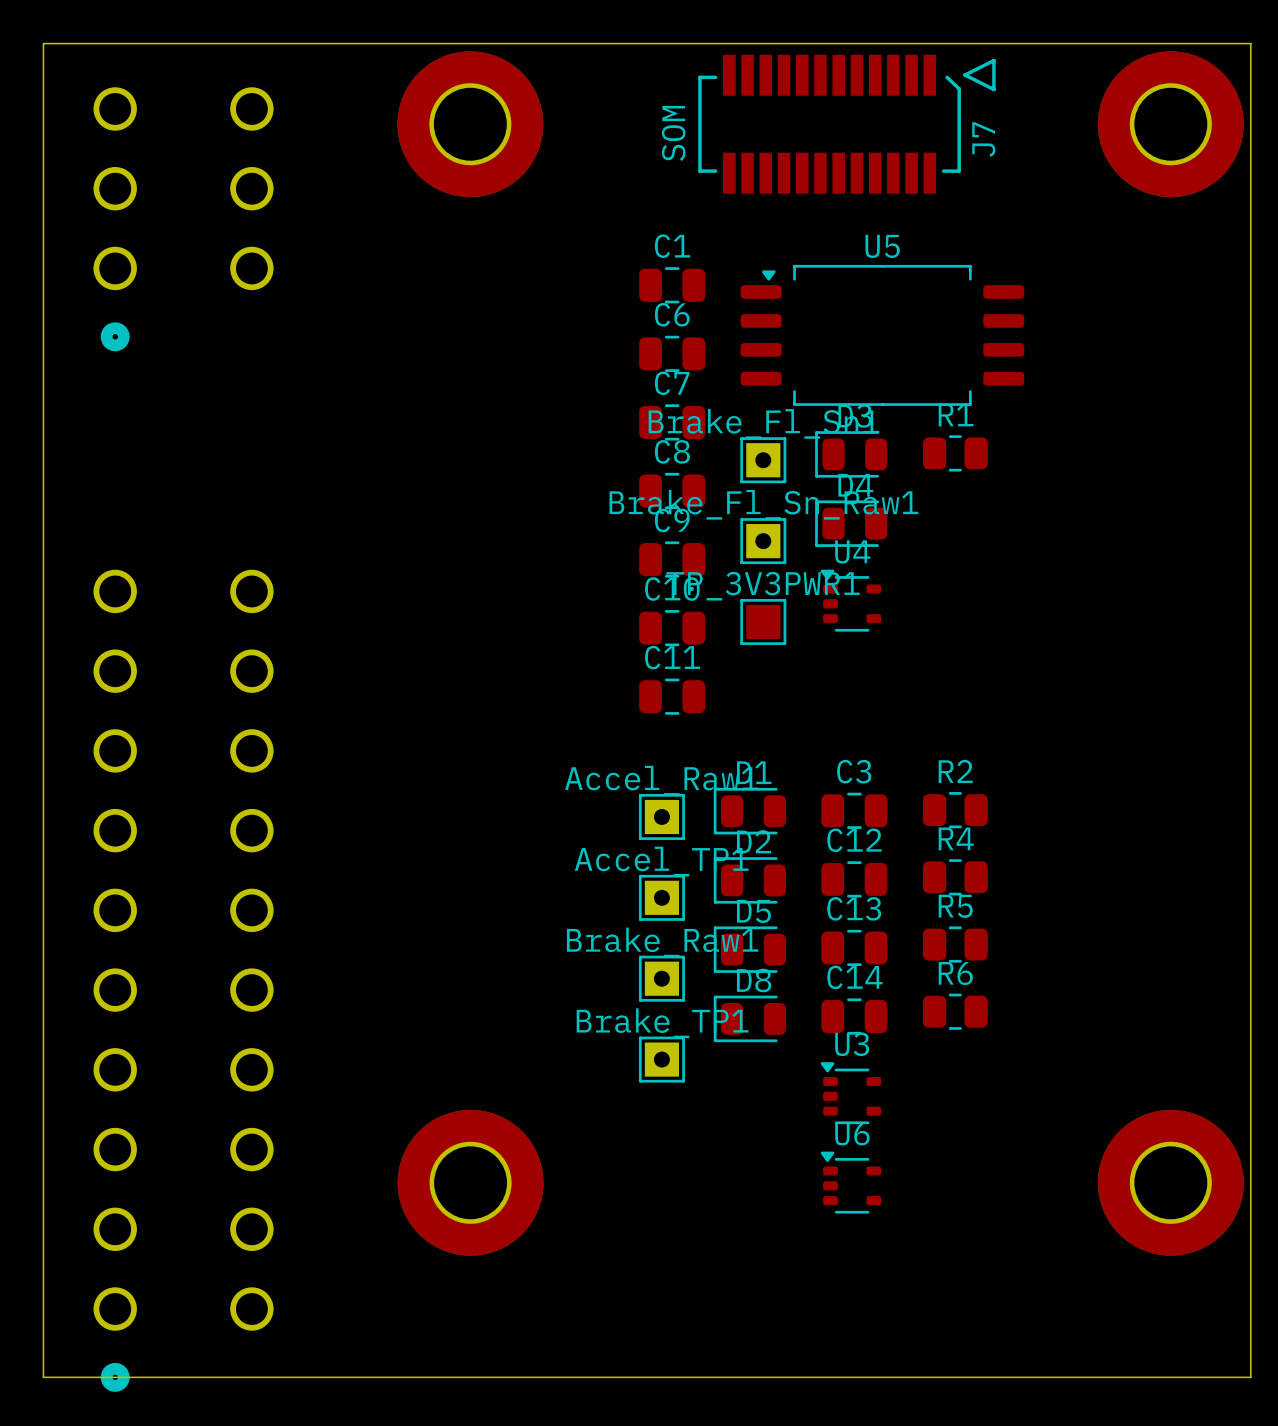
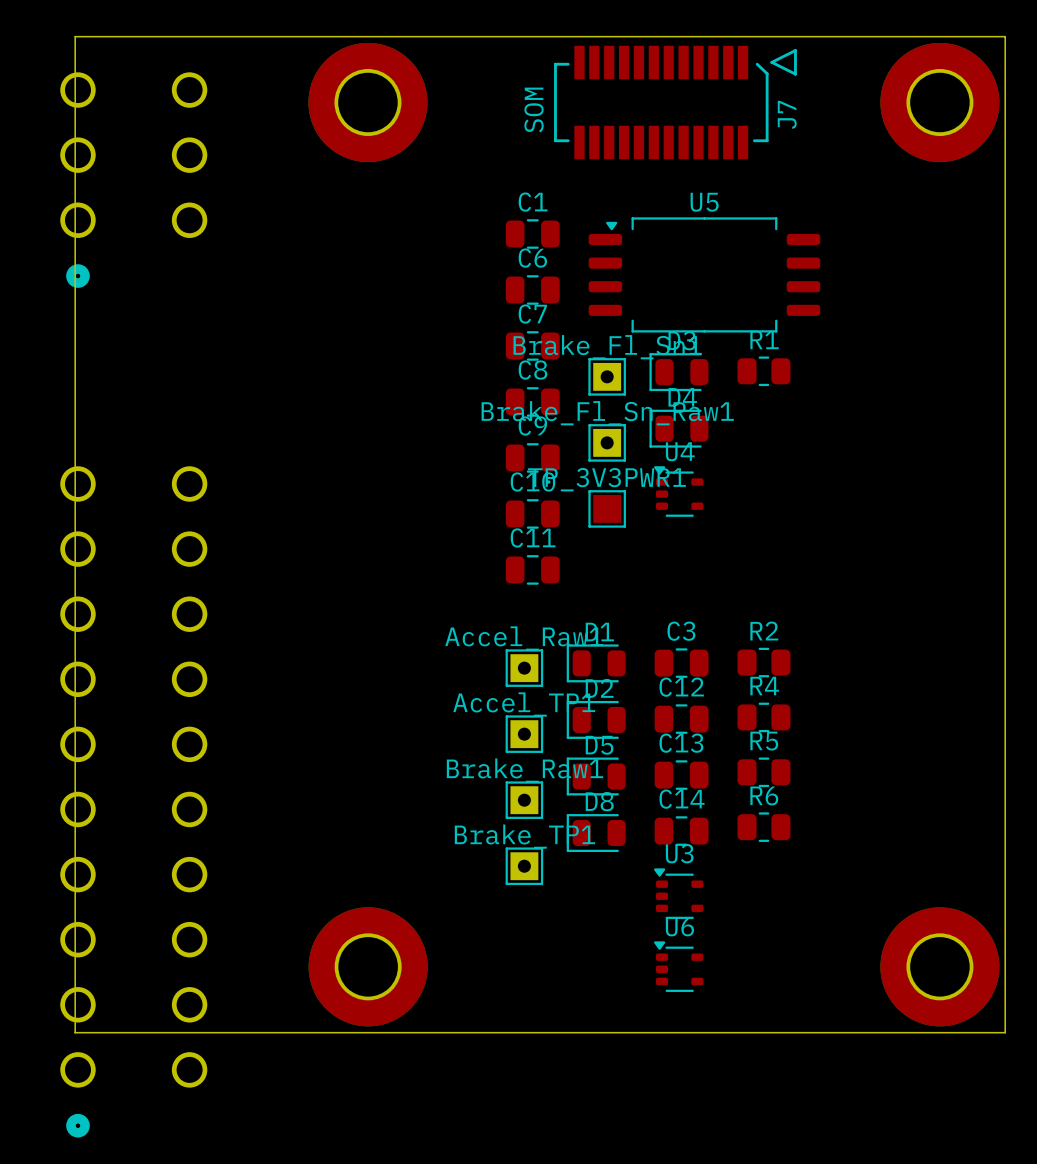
board edge: (111, 43) (43, 43) (43, 1377) (1250, 1377) (1250, 1263) -> (75, 36) (75, 1032) (1005, 1032)

